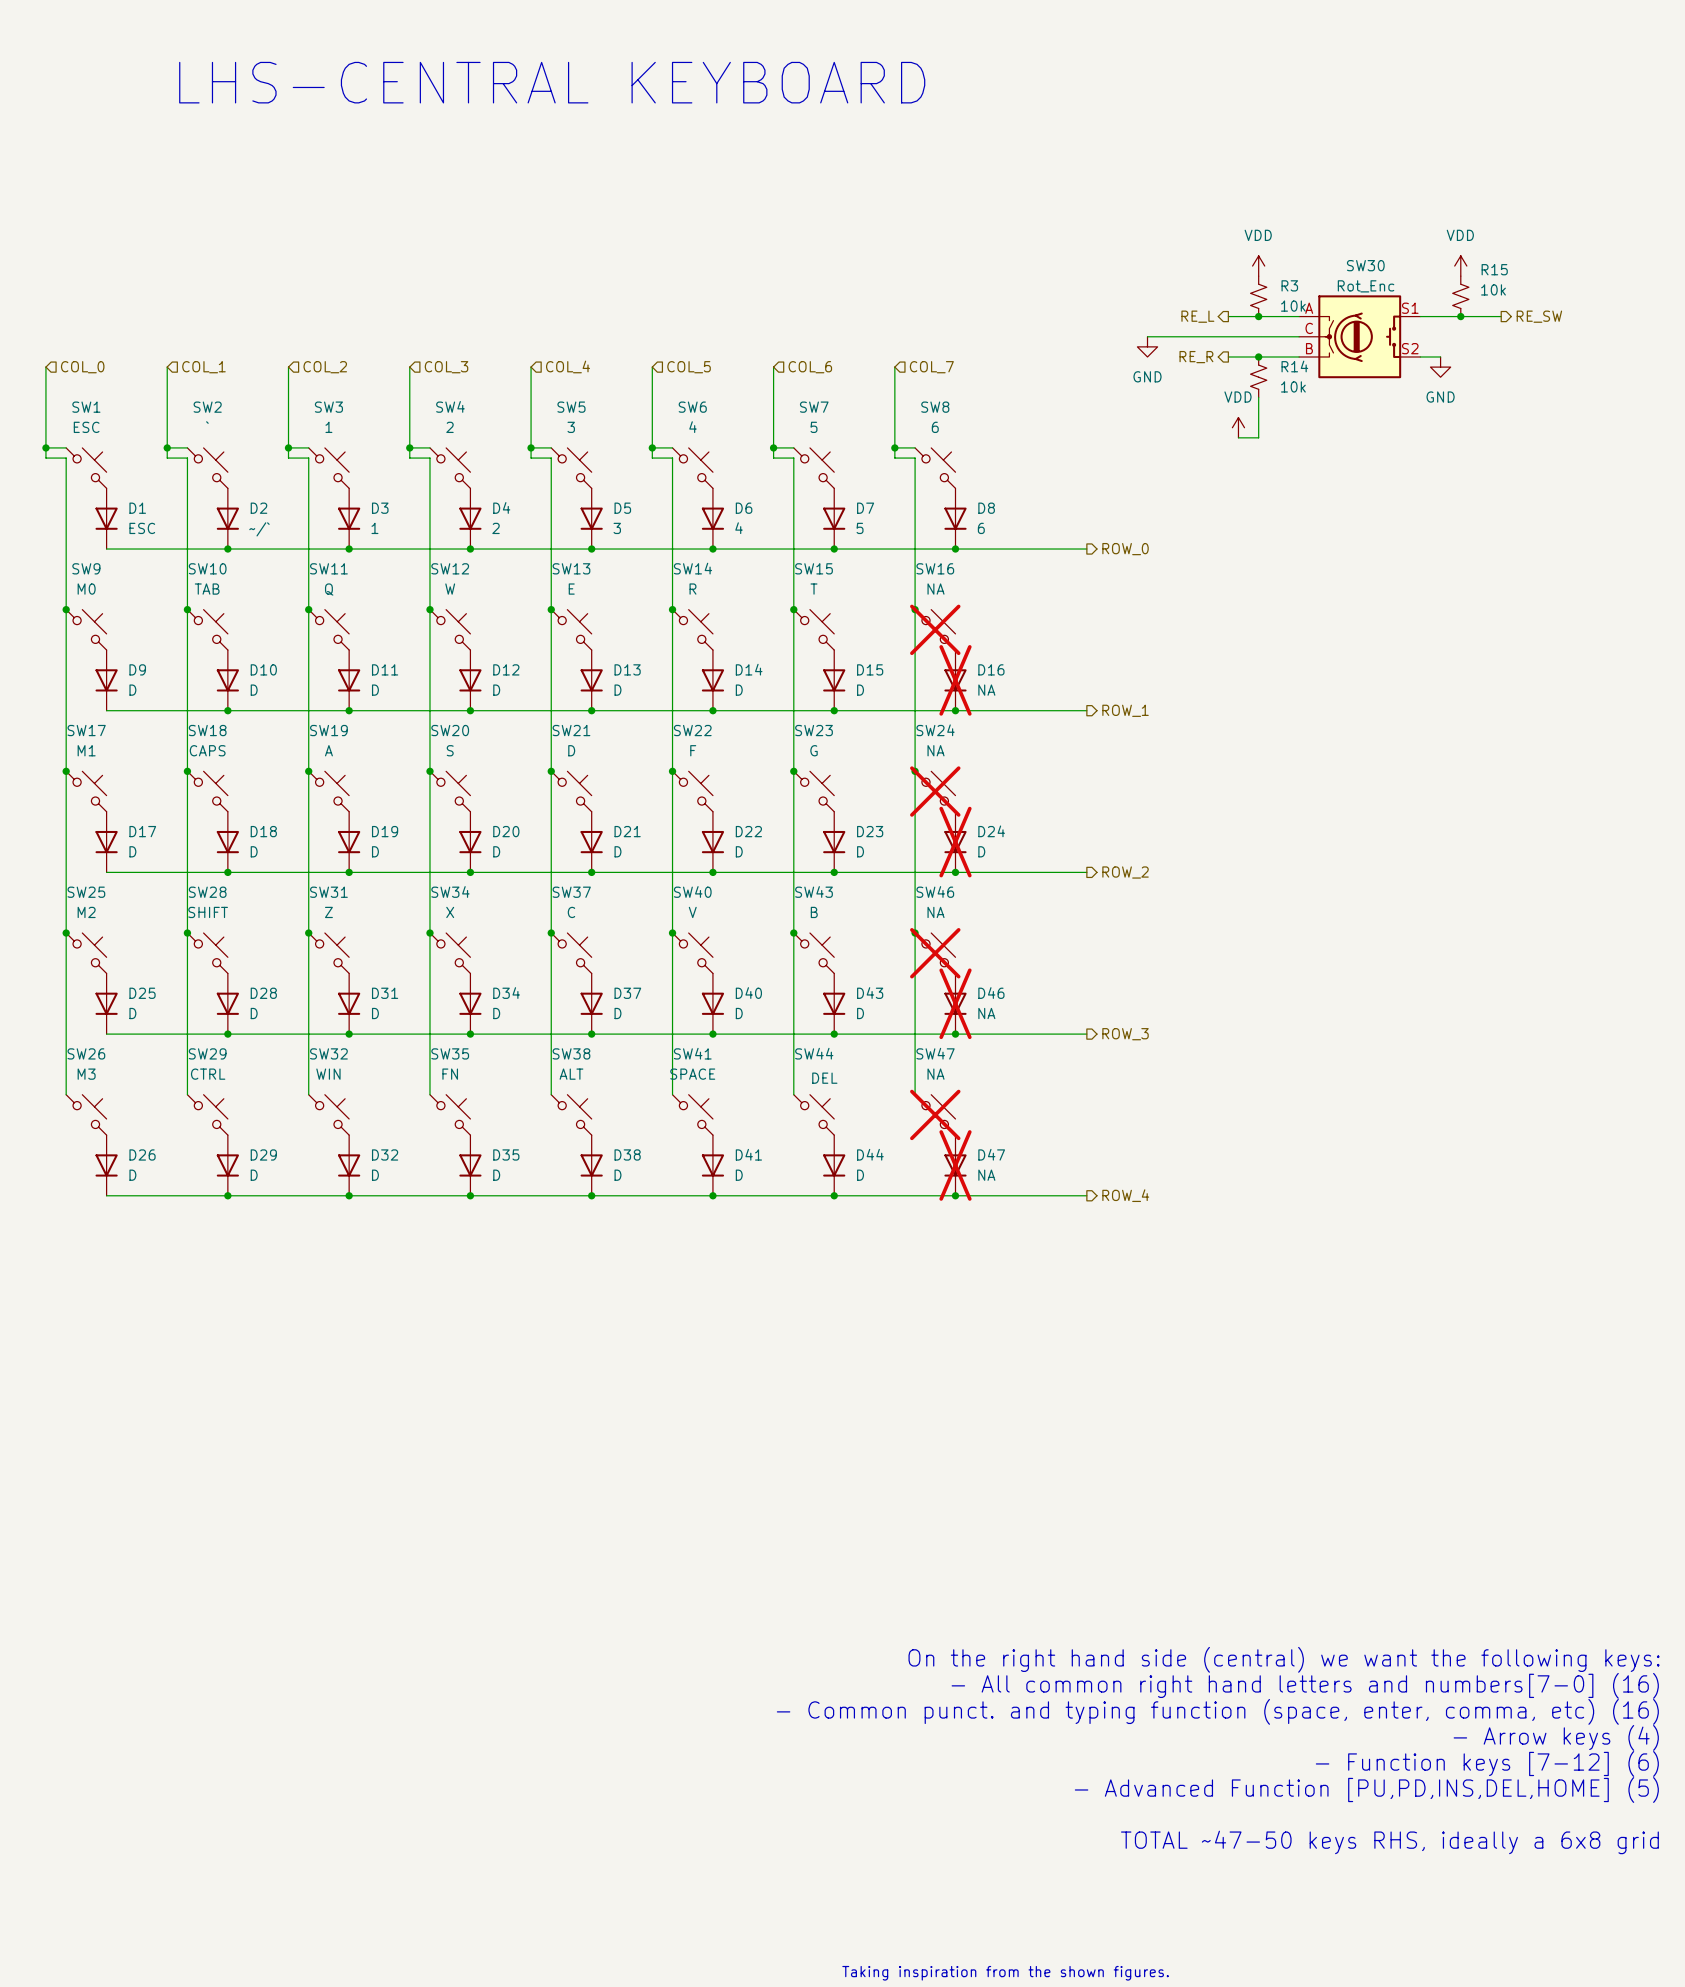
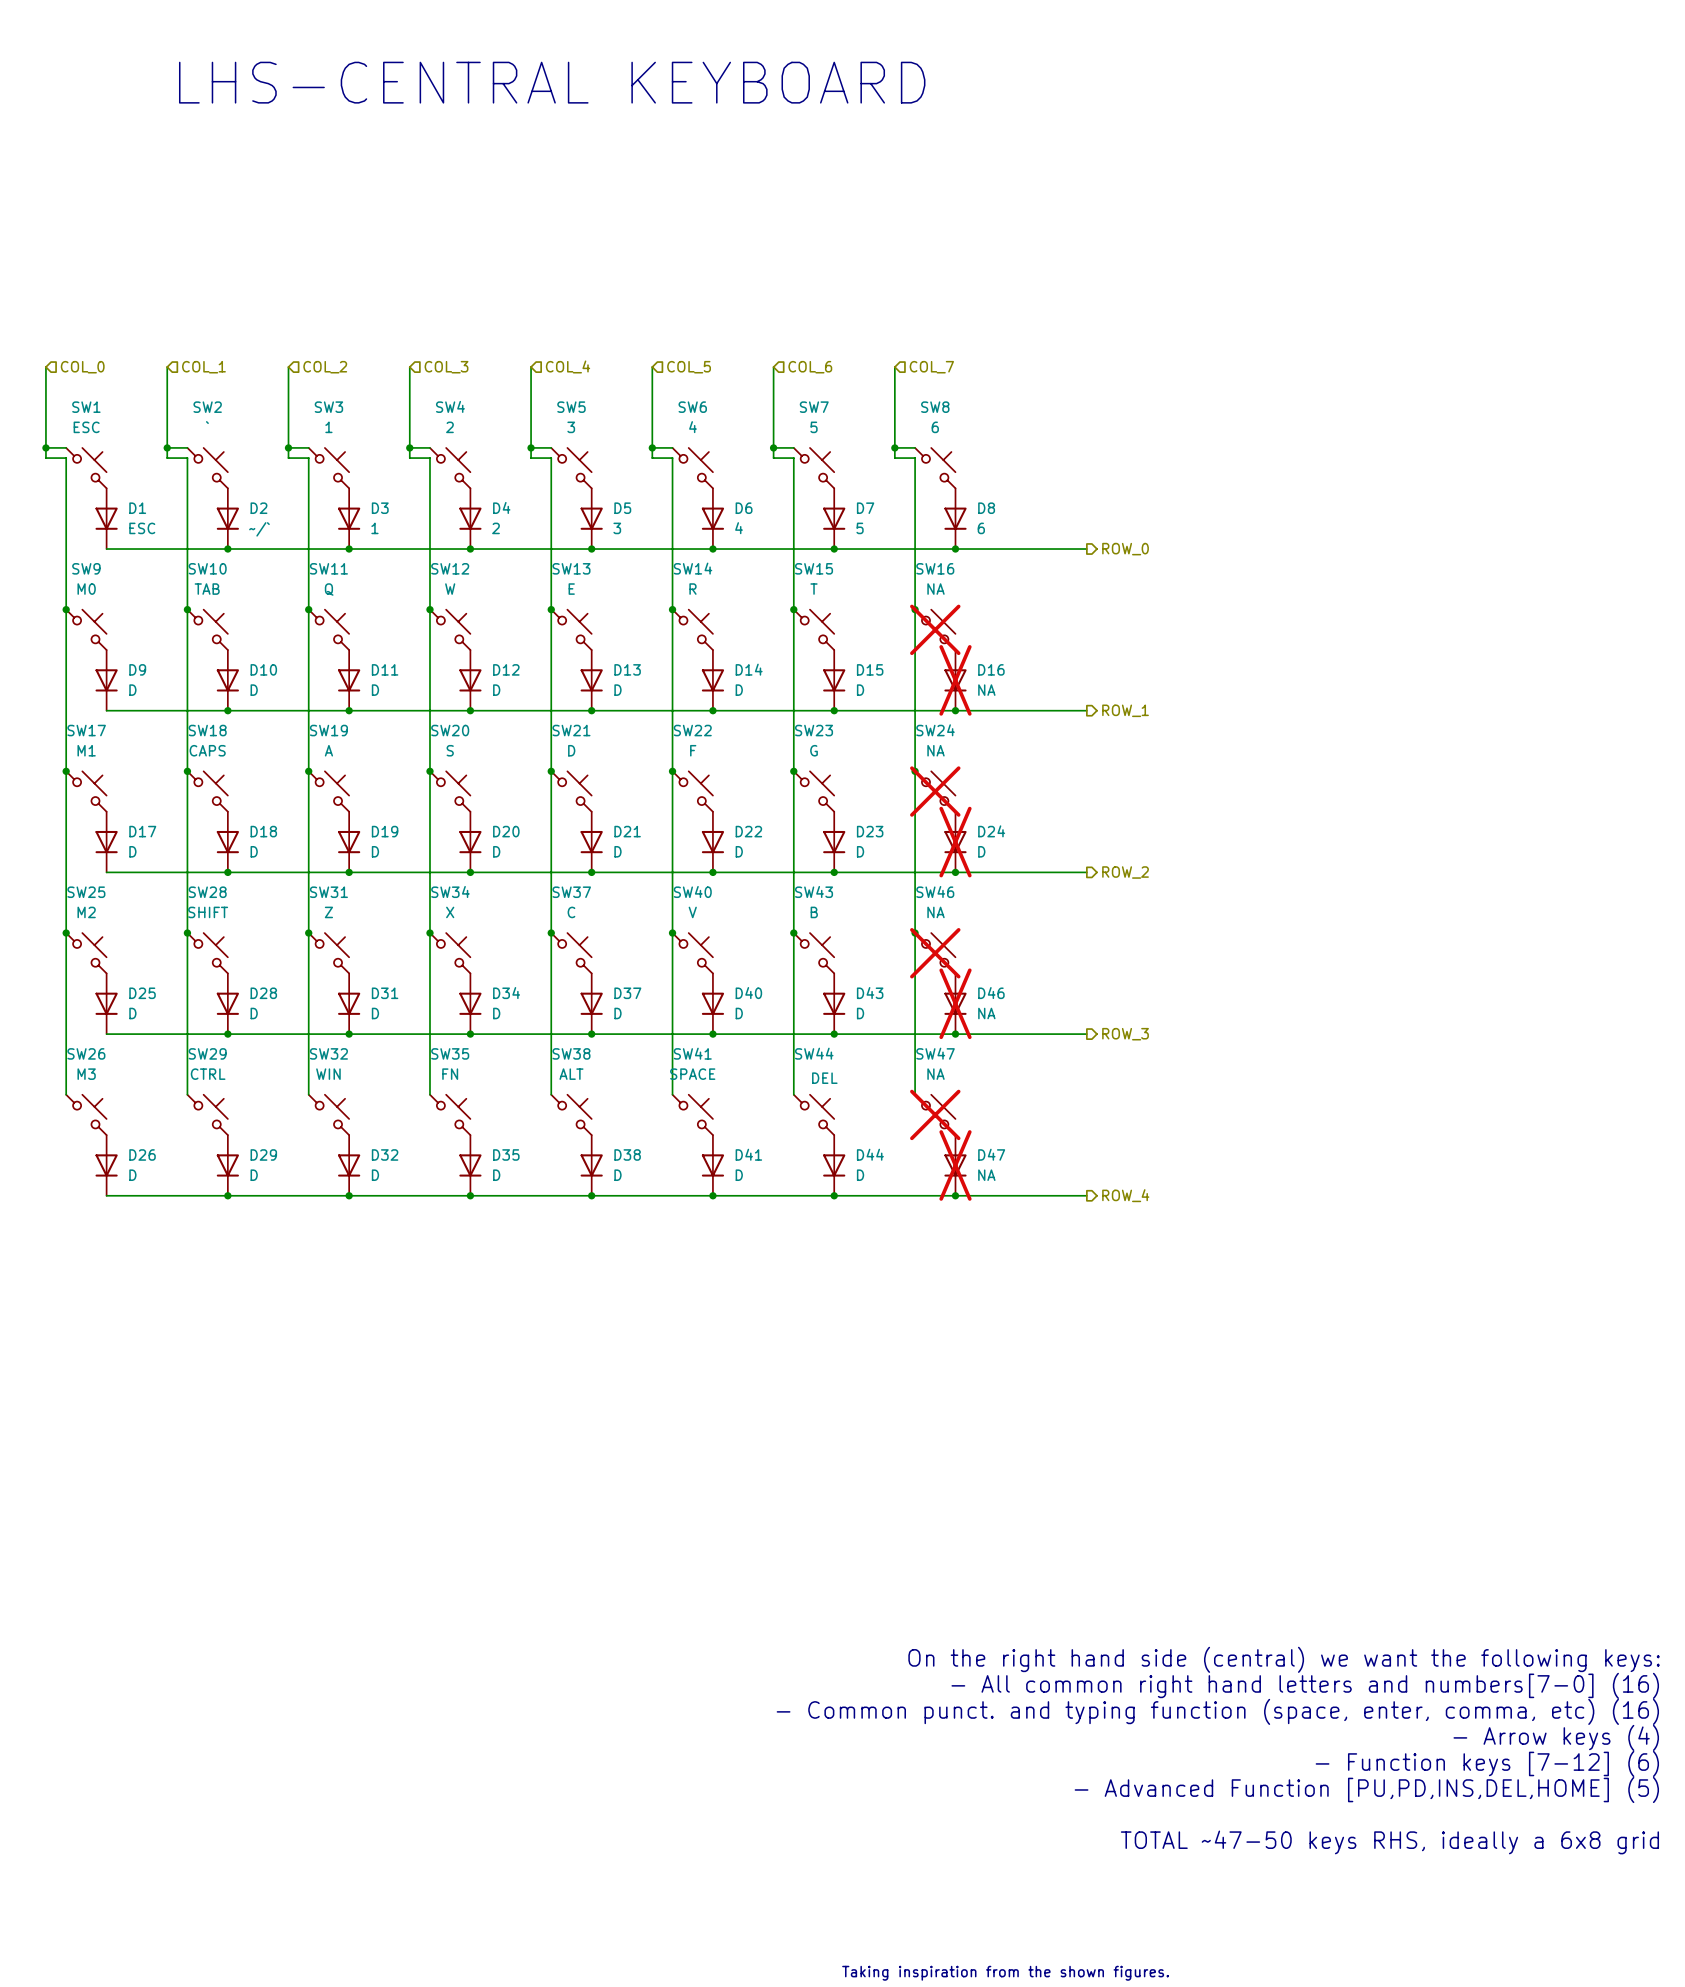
power symbol: VDD (1258, 266) -> none
power symbol: VDD (1460, 266) -> none
R3: 10k (1258, 296) -> none
R15: 10k (1460, 296) -> none
hierarchical label: RE_L (1197, 316) -> none
wire: (1228, 316) (1299, 316) -> none
junction: (1258, 316) -> none
wire: (1420, 316) (1501, 316) -> none
junction: (1460, 316) -> none
hierarchical label: RE_SW (1539, 316) -> none
wire: (1147, 336) (1299, 336) -> none
SW30: Rot_Enc (1359, 336) -> none
power symbol: GND (1147, 346) -> none
wire: (1228, 356) (1299, 356) -> none
junction: (1258, 356) -> none
wire: (1420, 356) (1440, 356) -> none
hierarchical label: RE_R (1196, 357) -> none
power symbol: GND (1440, 367) -> none
R14: 10k (1258, 377) -> none
wire: (1258, 397) (1258, 437) (1238, 437) -> none
power symbol: VDD (1238, 427) -> none

